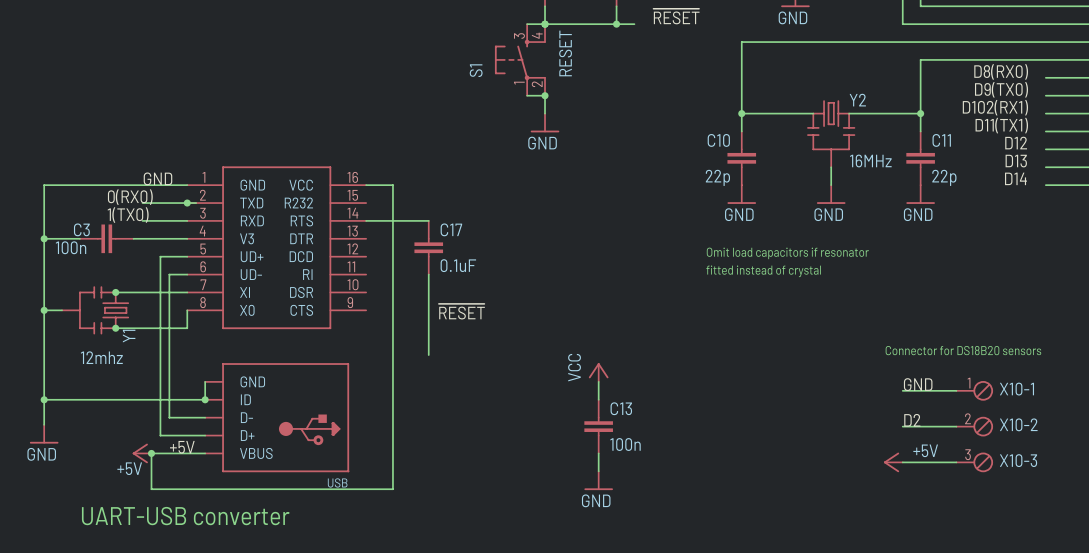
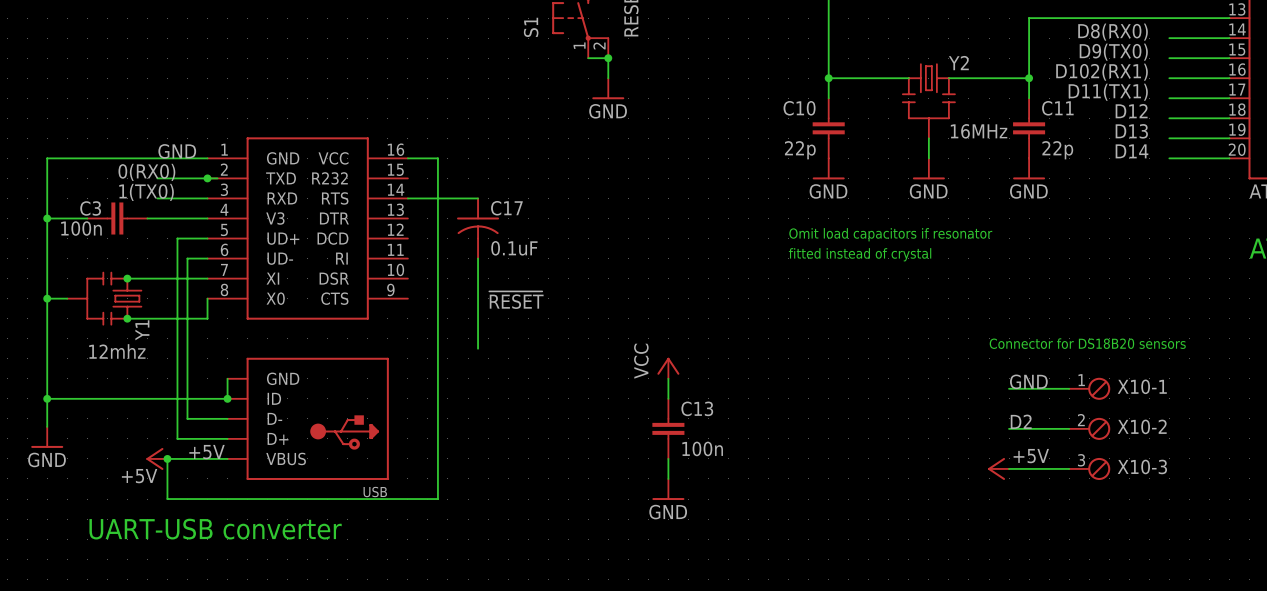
C17 symbol: [414, 220, 444, 275] -> [456, 198, 500, 259]

